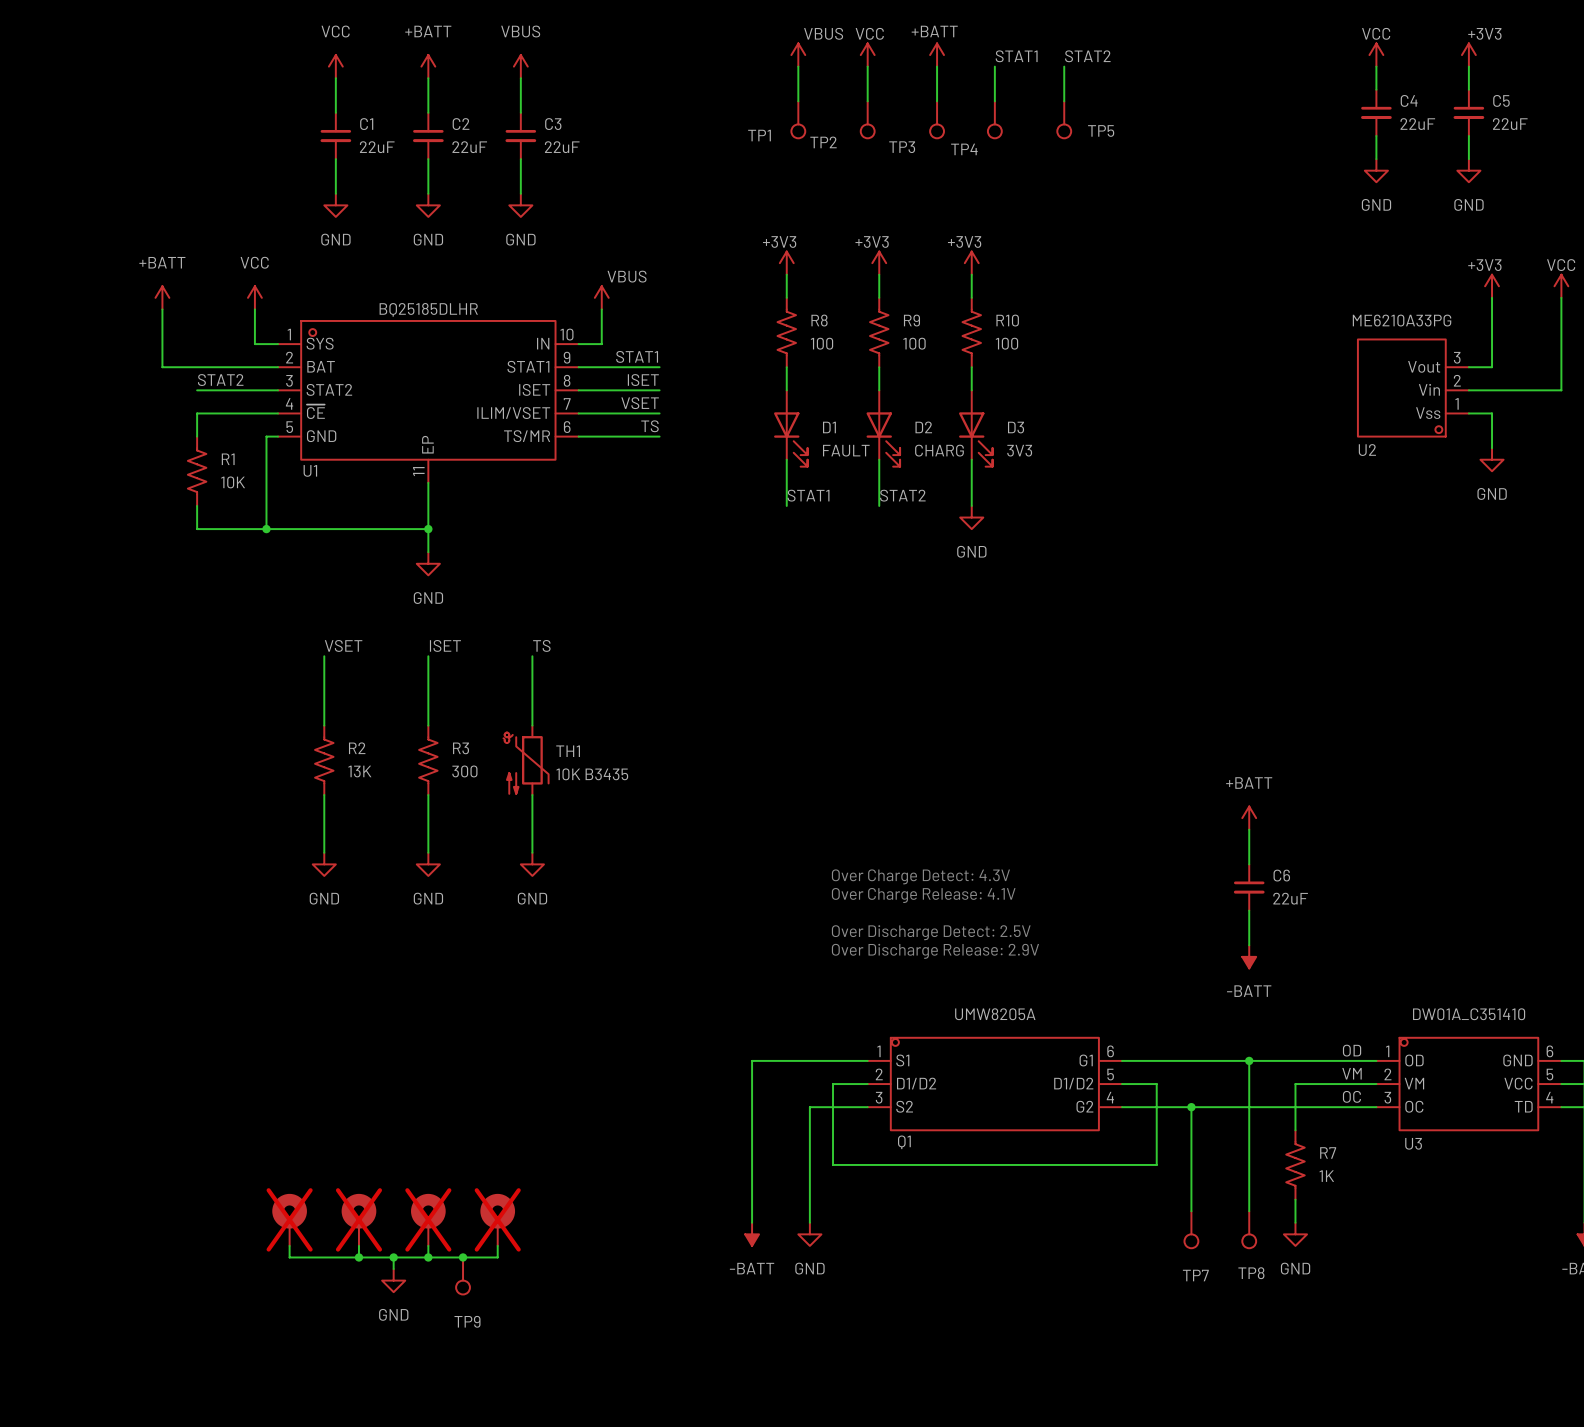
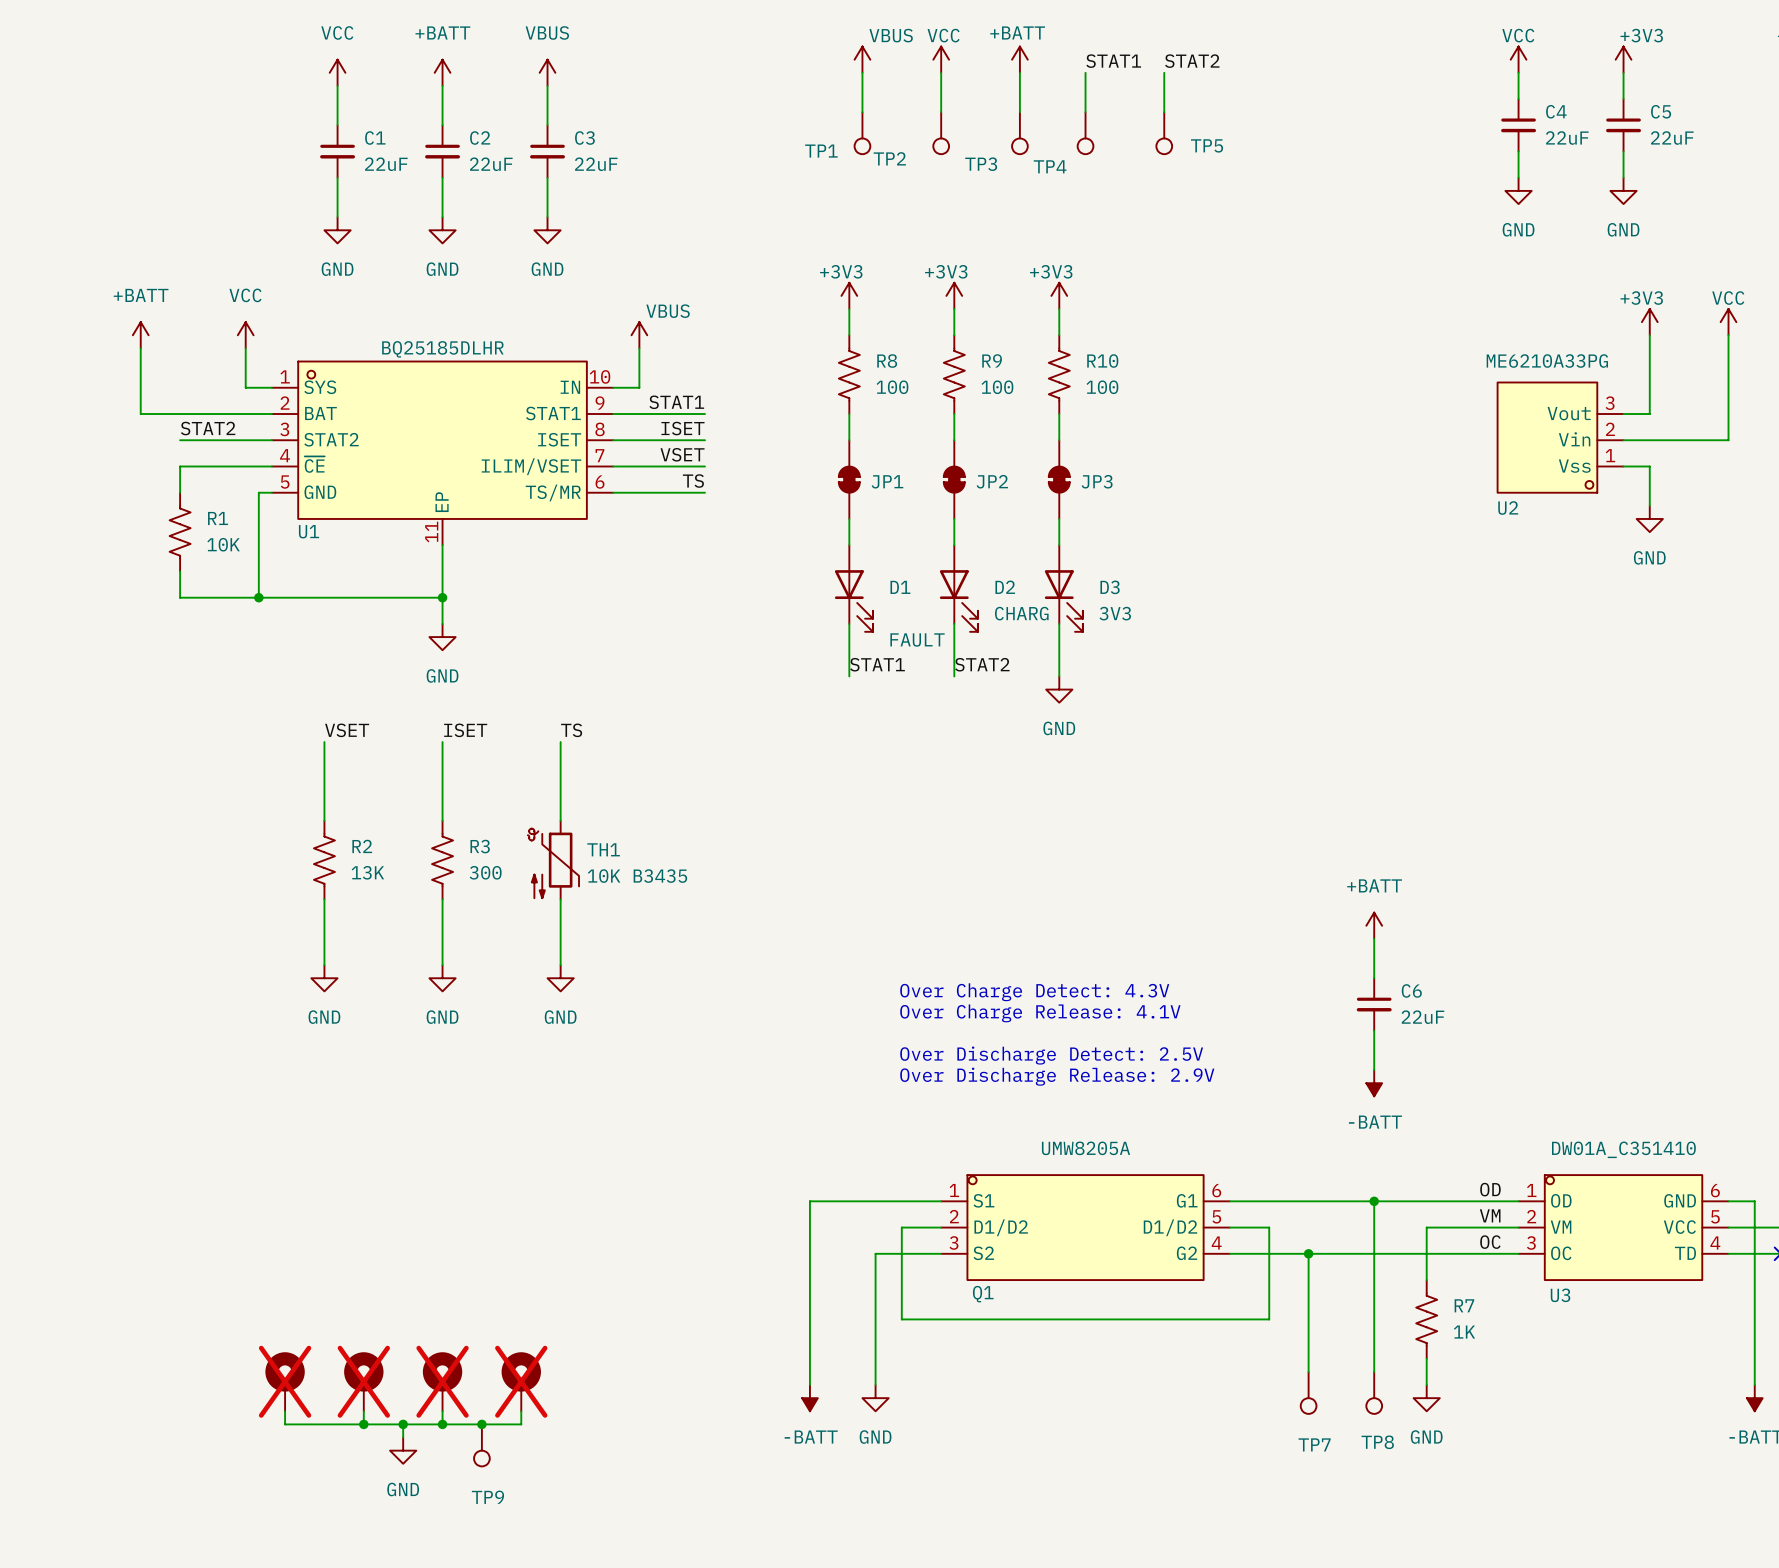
JP1: none -> (849, 479)
JP2: none -> (954, 479)
JP3: none -> (1059, 479)
D1 position: (790, 428) -> (853, 588)
D2 position: (883, 428) -> (958, 588)
D3 position: (975, 428) -> (1063, 588)
D1 value position: FAULT (846, 450) -> FAULT (917, 639)
label position: STAT1 (808, 495) -> STAT1 (877, 664)
label position: STAT2 (902, 495) -> STAT2 (982, 664)
power symbol position: GND (971, 517) -> GND (1059, 689)
wire: none -> (849, 623) (849, 676)
wire: none -> (954, 623) (954, 676)
wire: none -> (1059, 623) (1059, 676)

